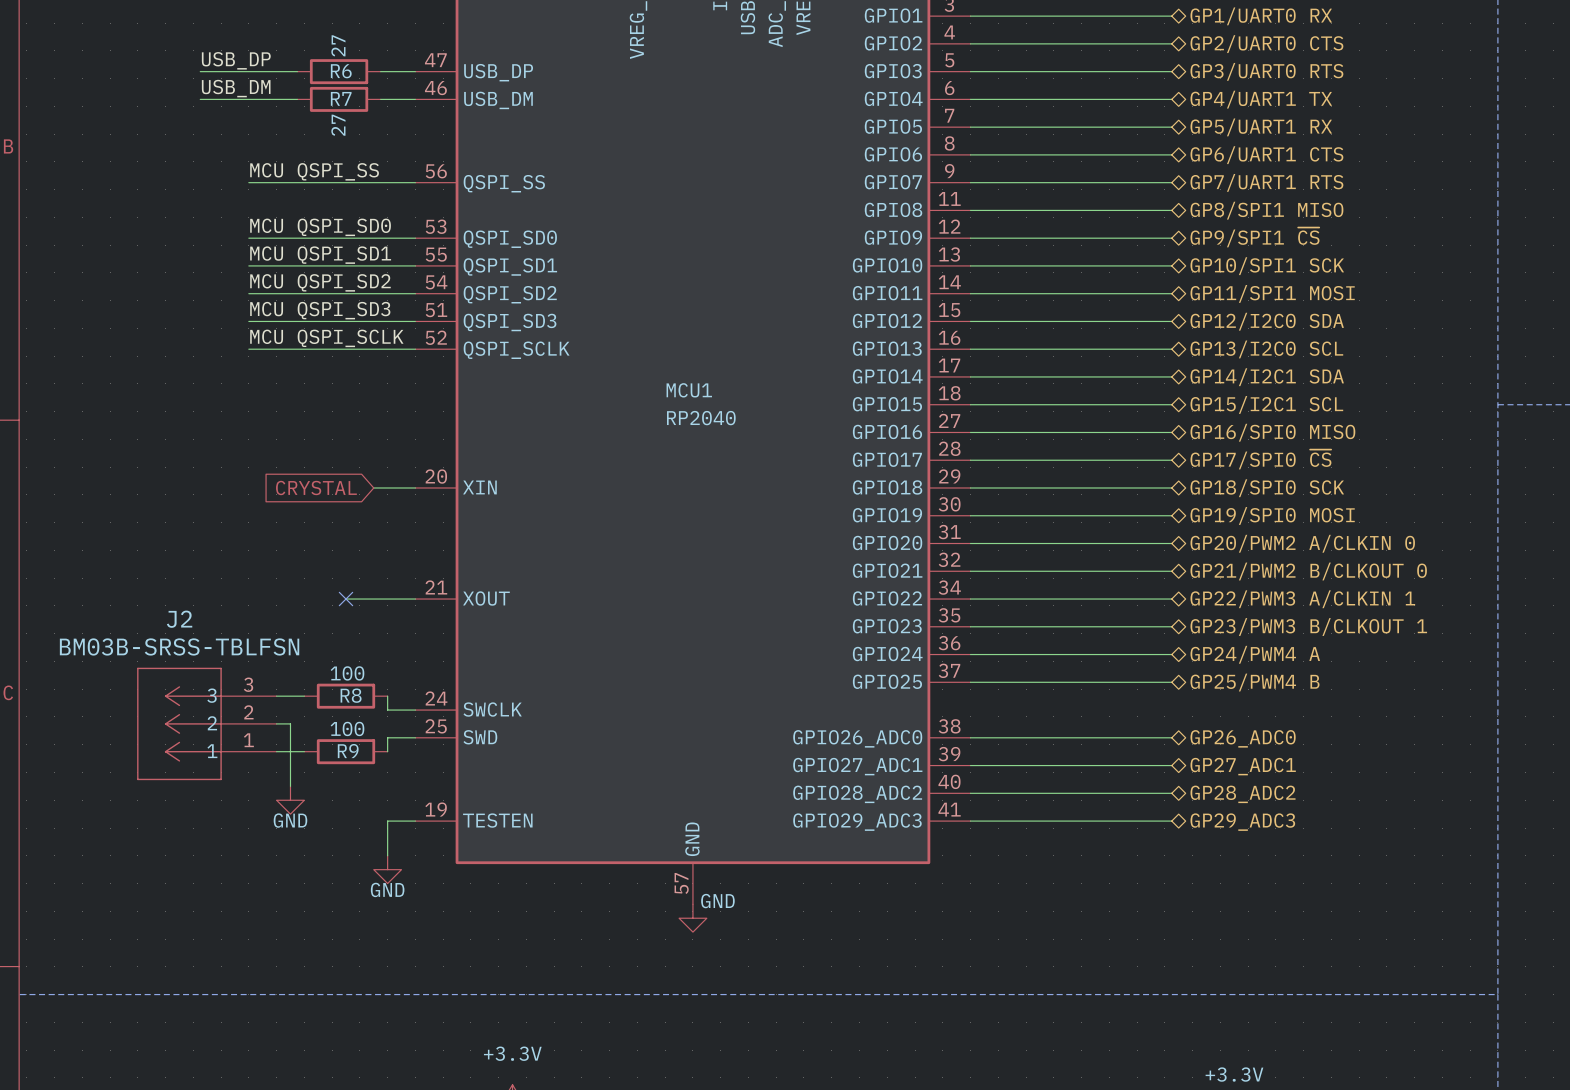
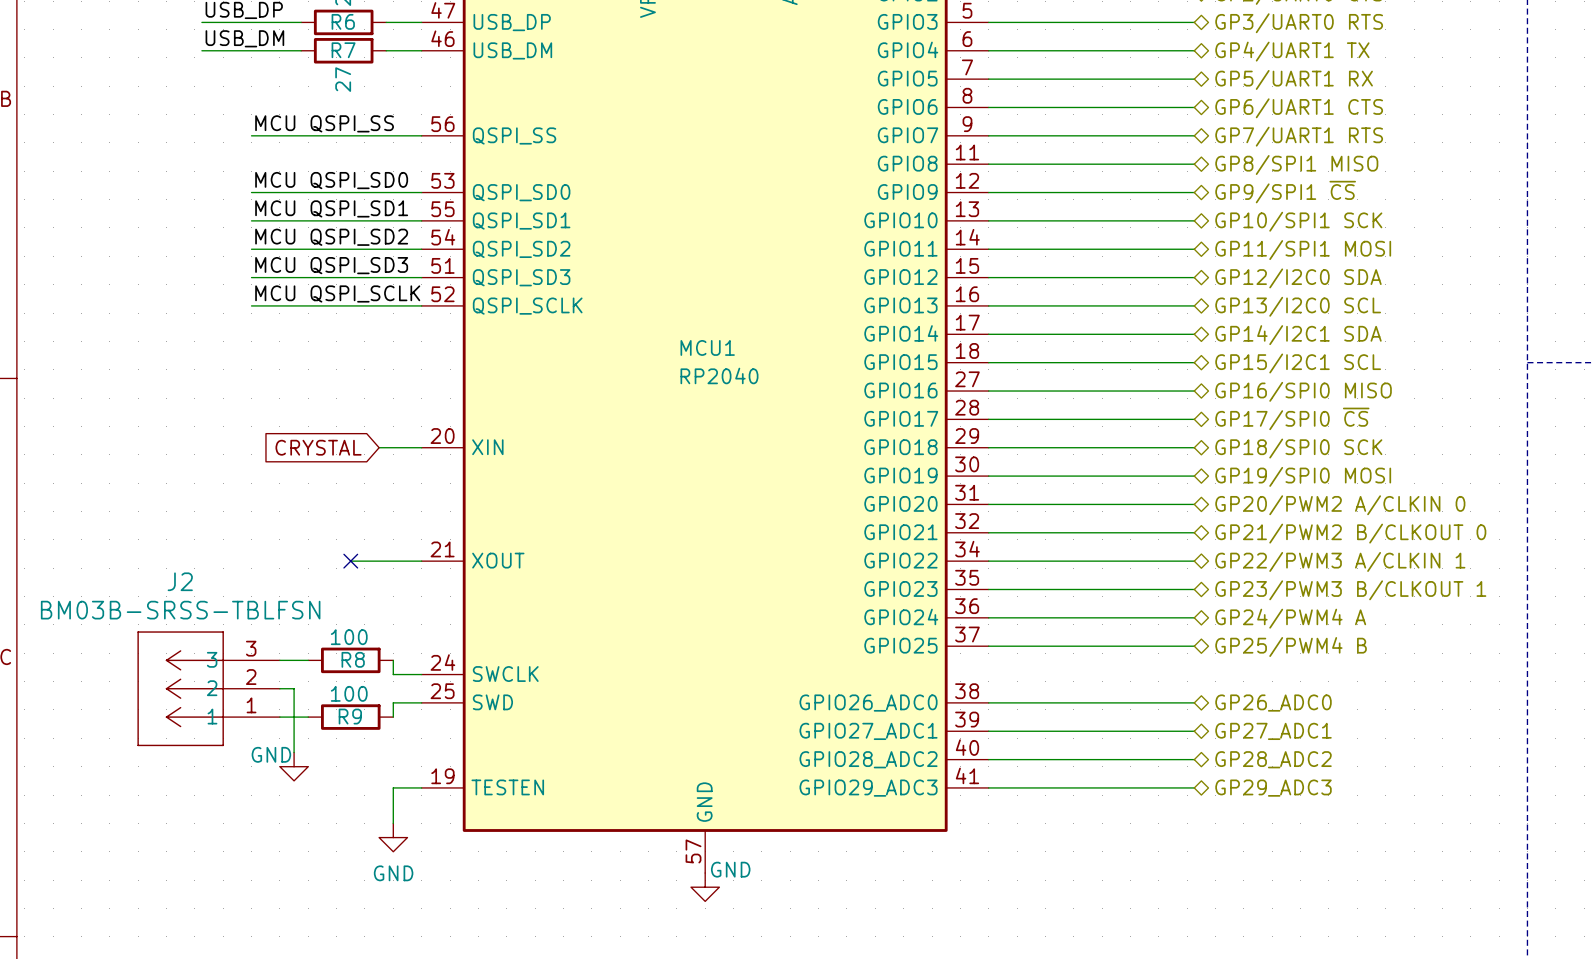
power symbol text position: GND (290, 820) -> GND (271, 754)
power symbol text position: GND (387, 889) -> GND (393, 873)

